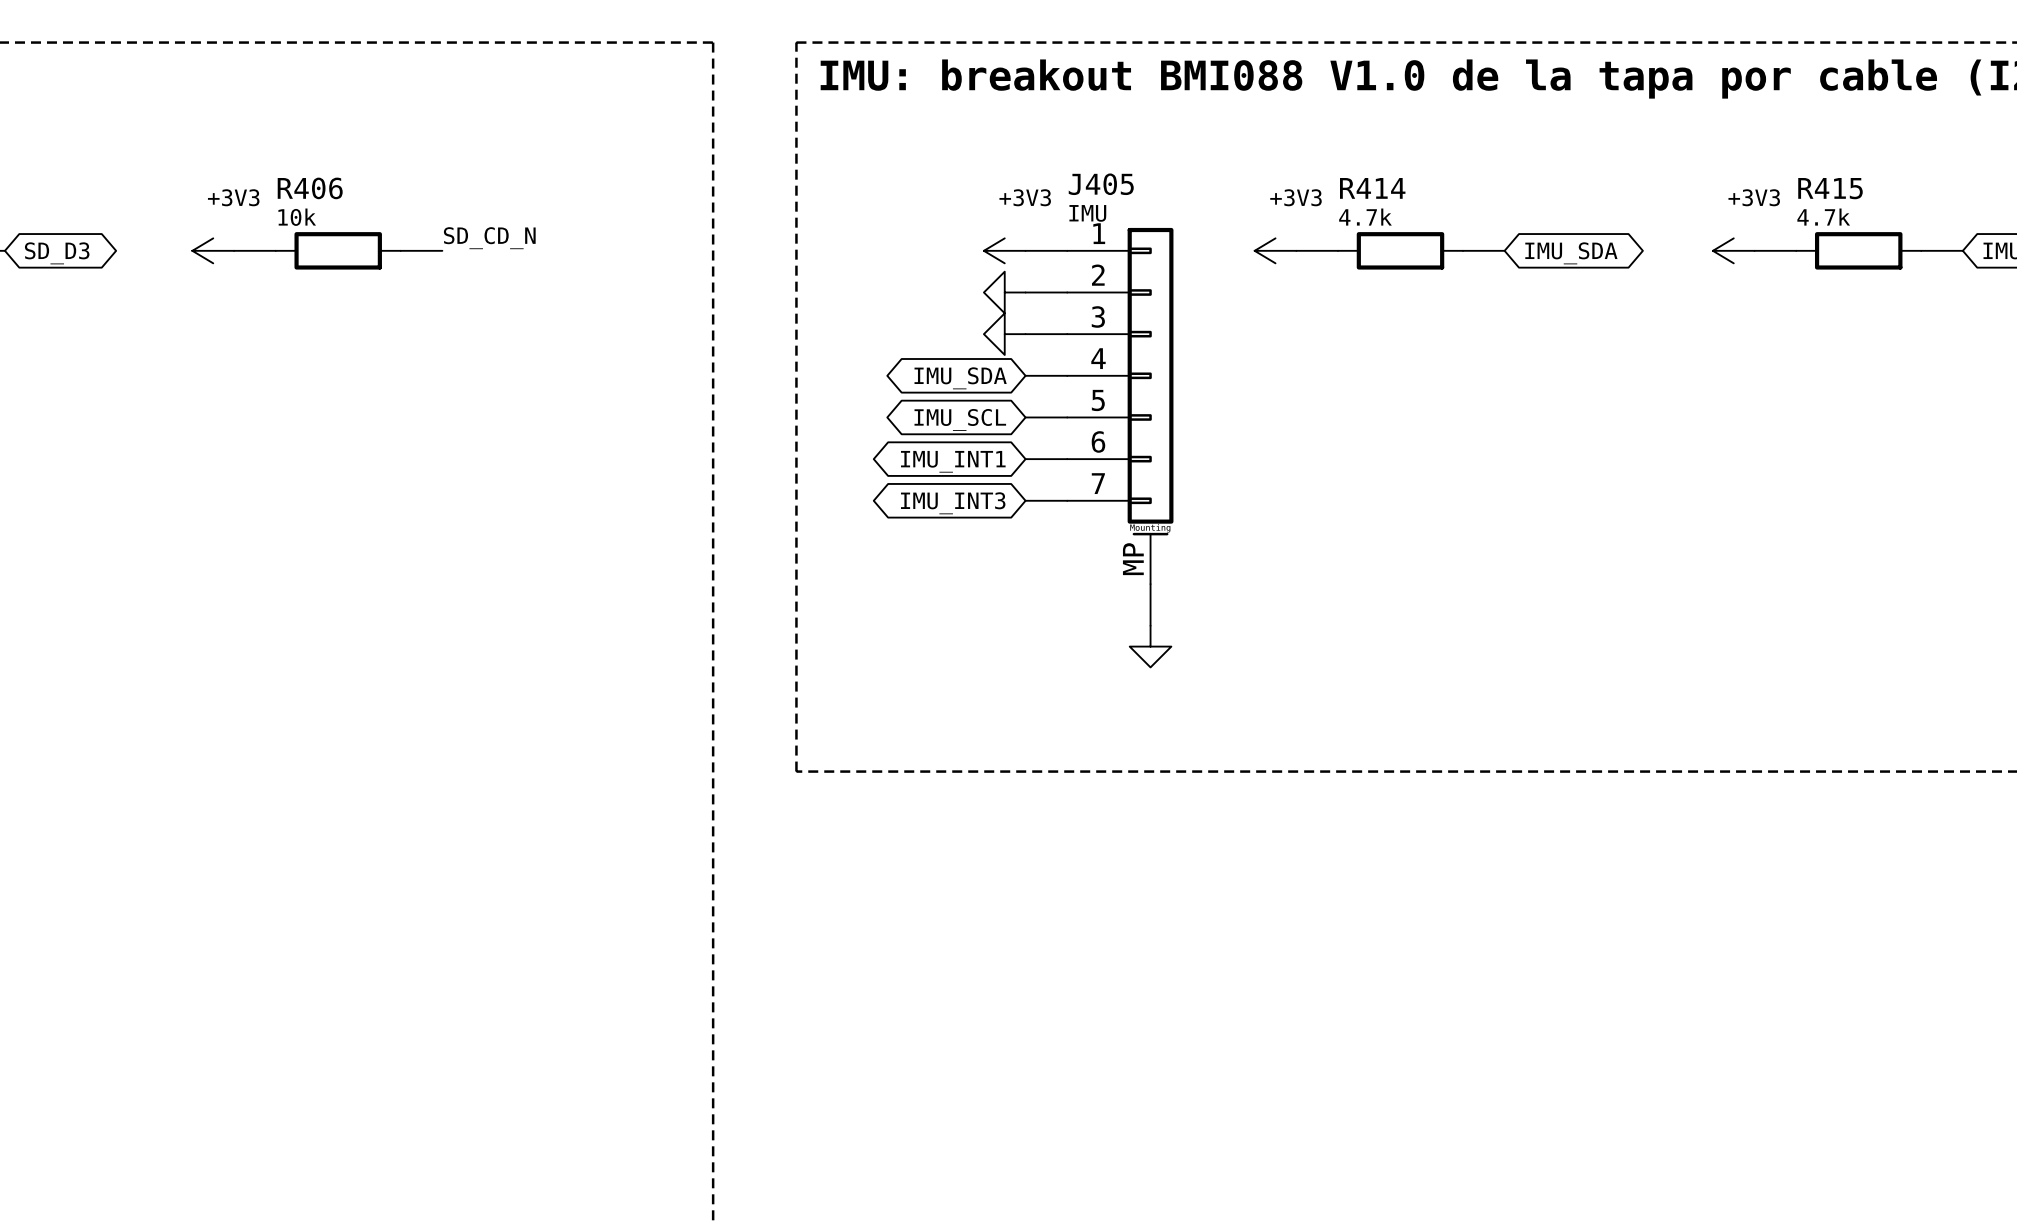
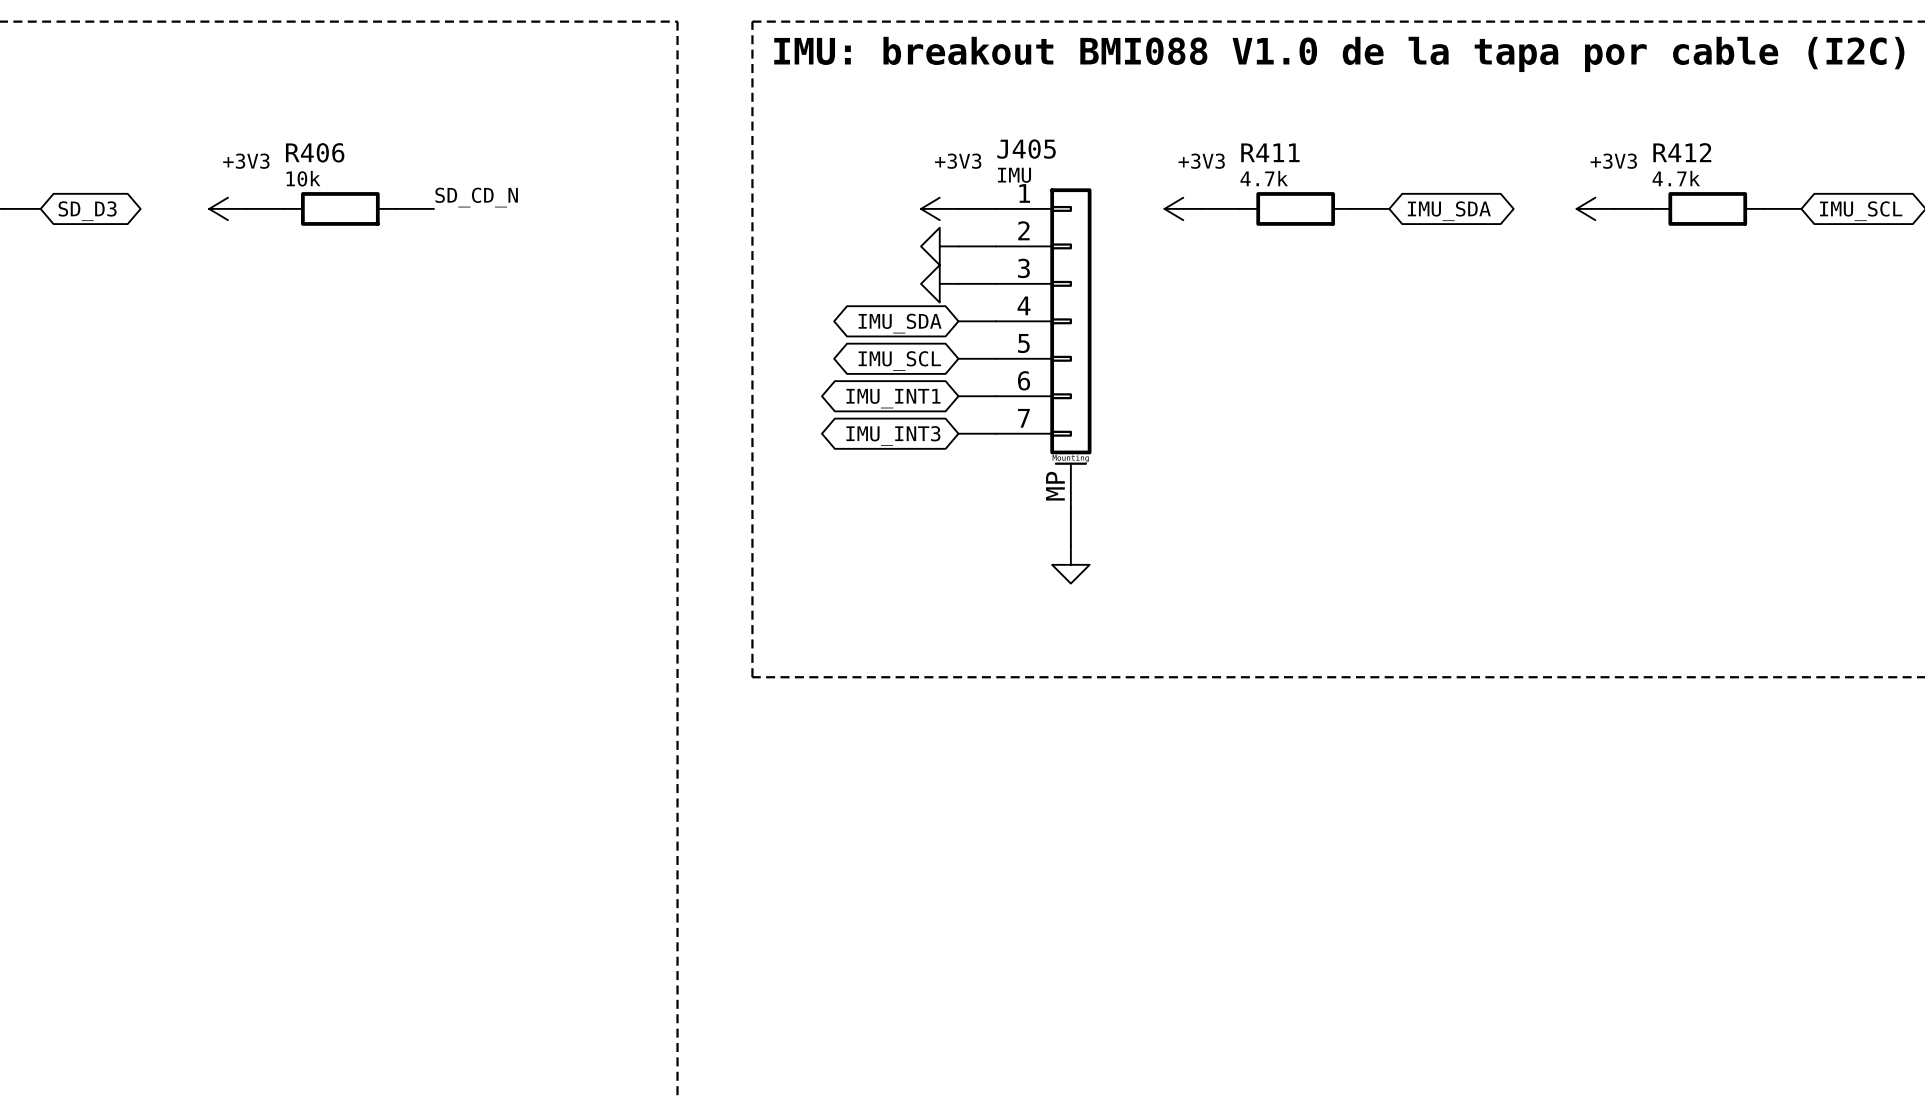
R414 name: R414 (1372, 188) -> R411 (1270, 152)
R415 name: R415 (1830, 188) -> R412 (1682, 152)

